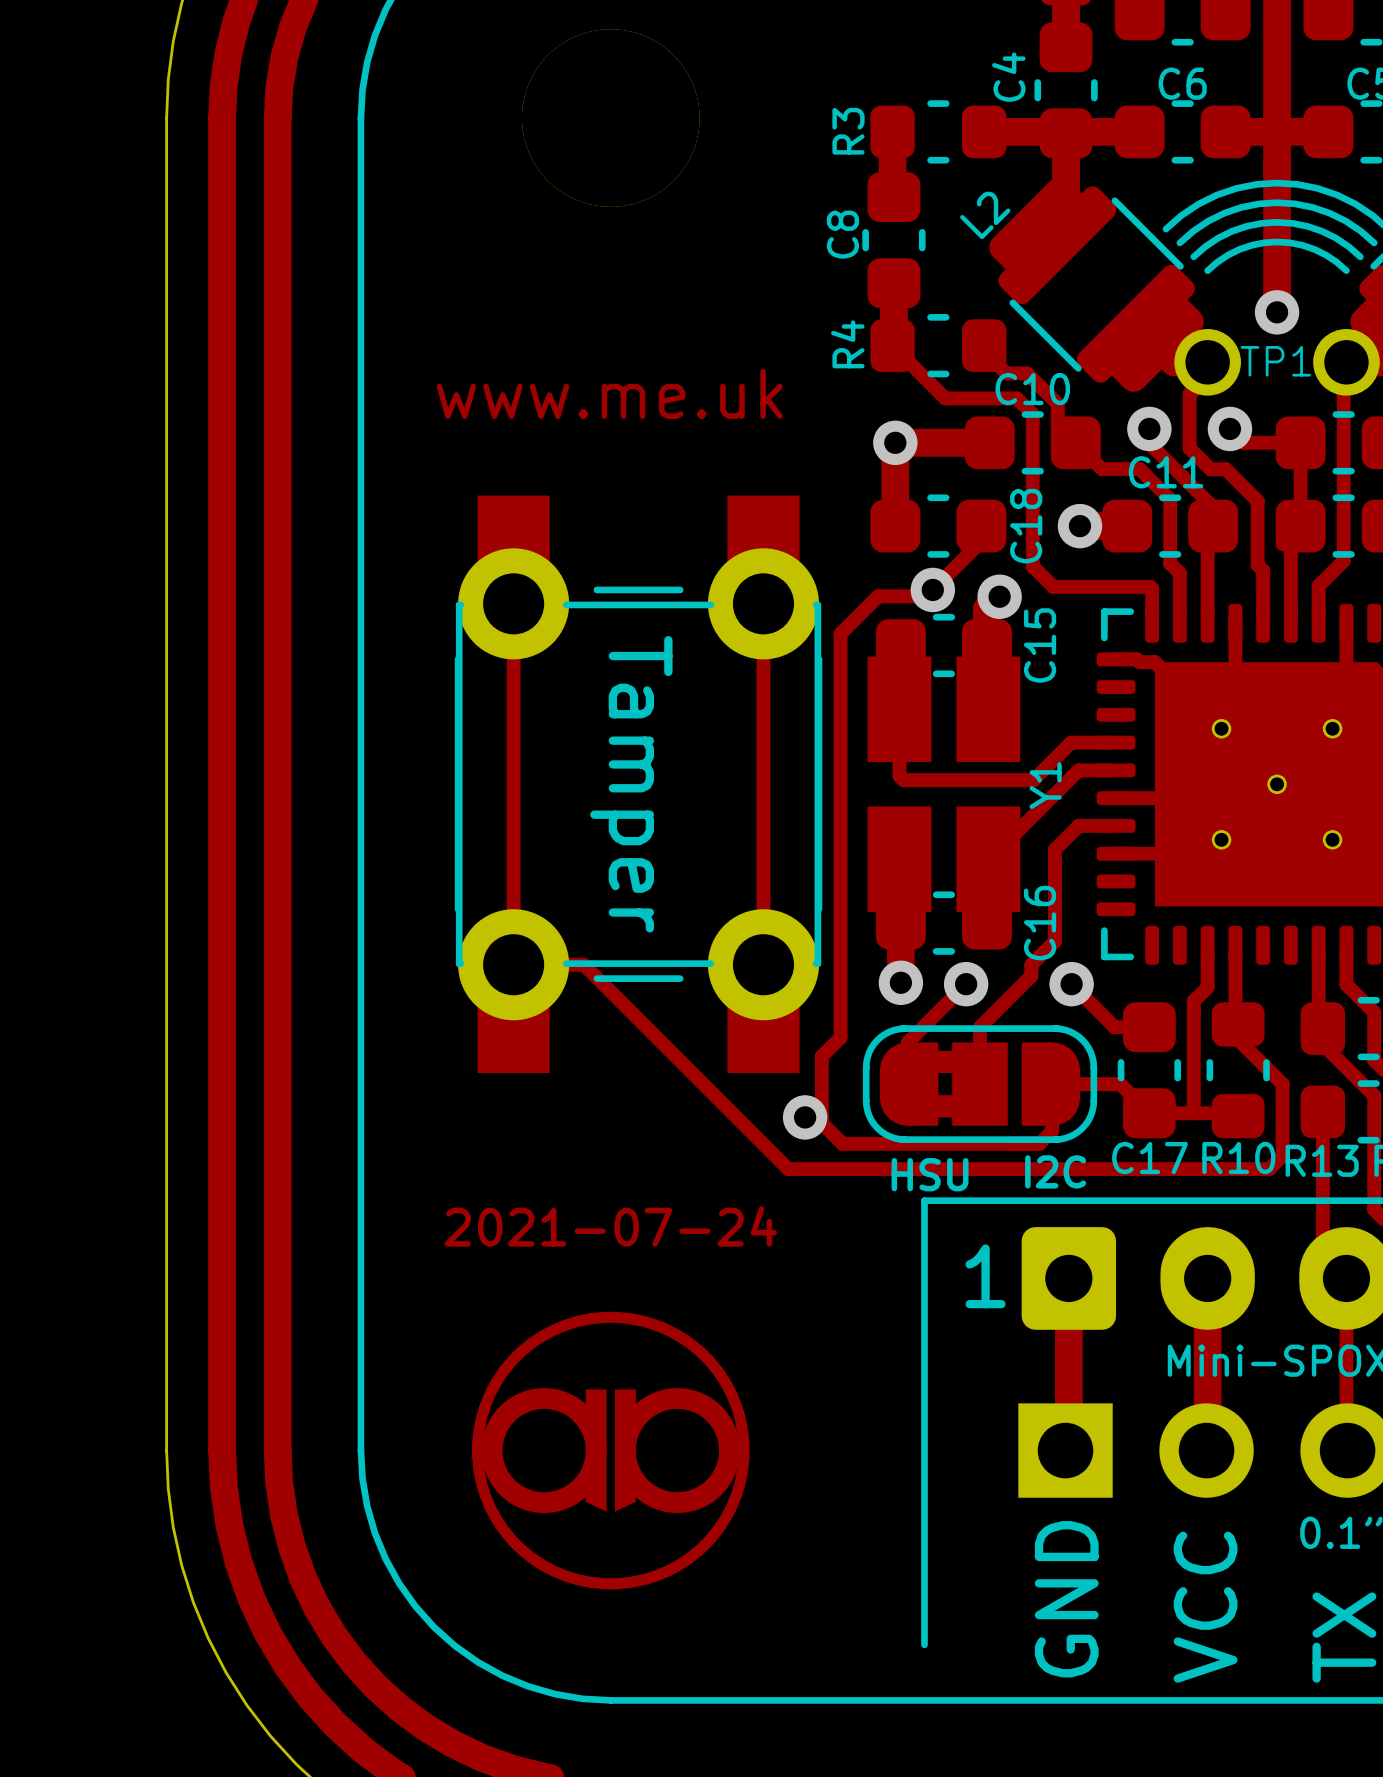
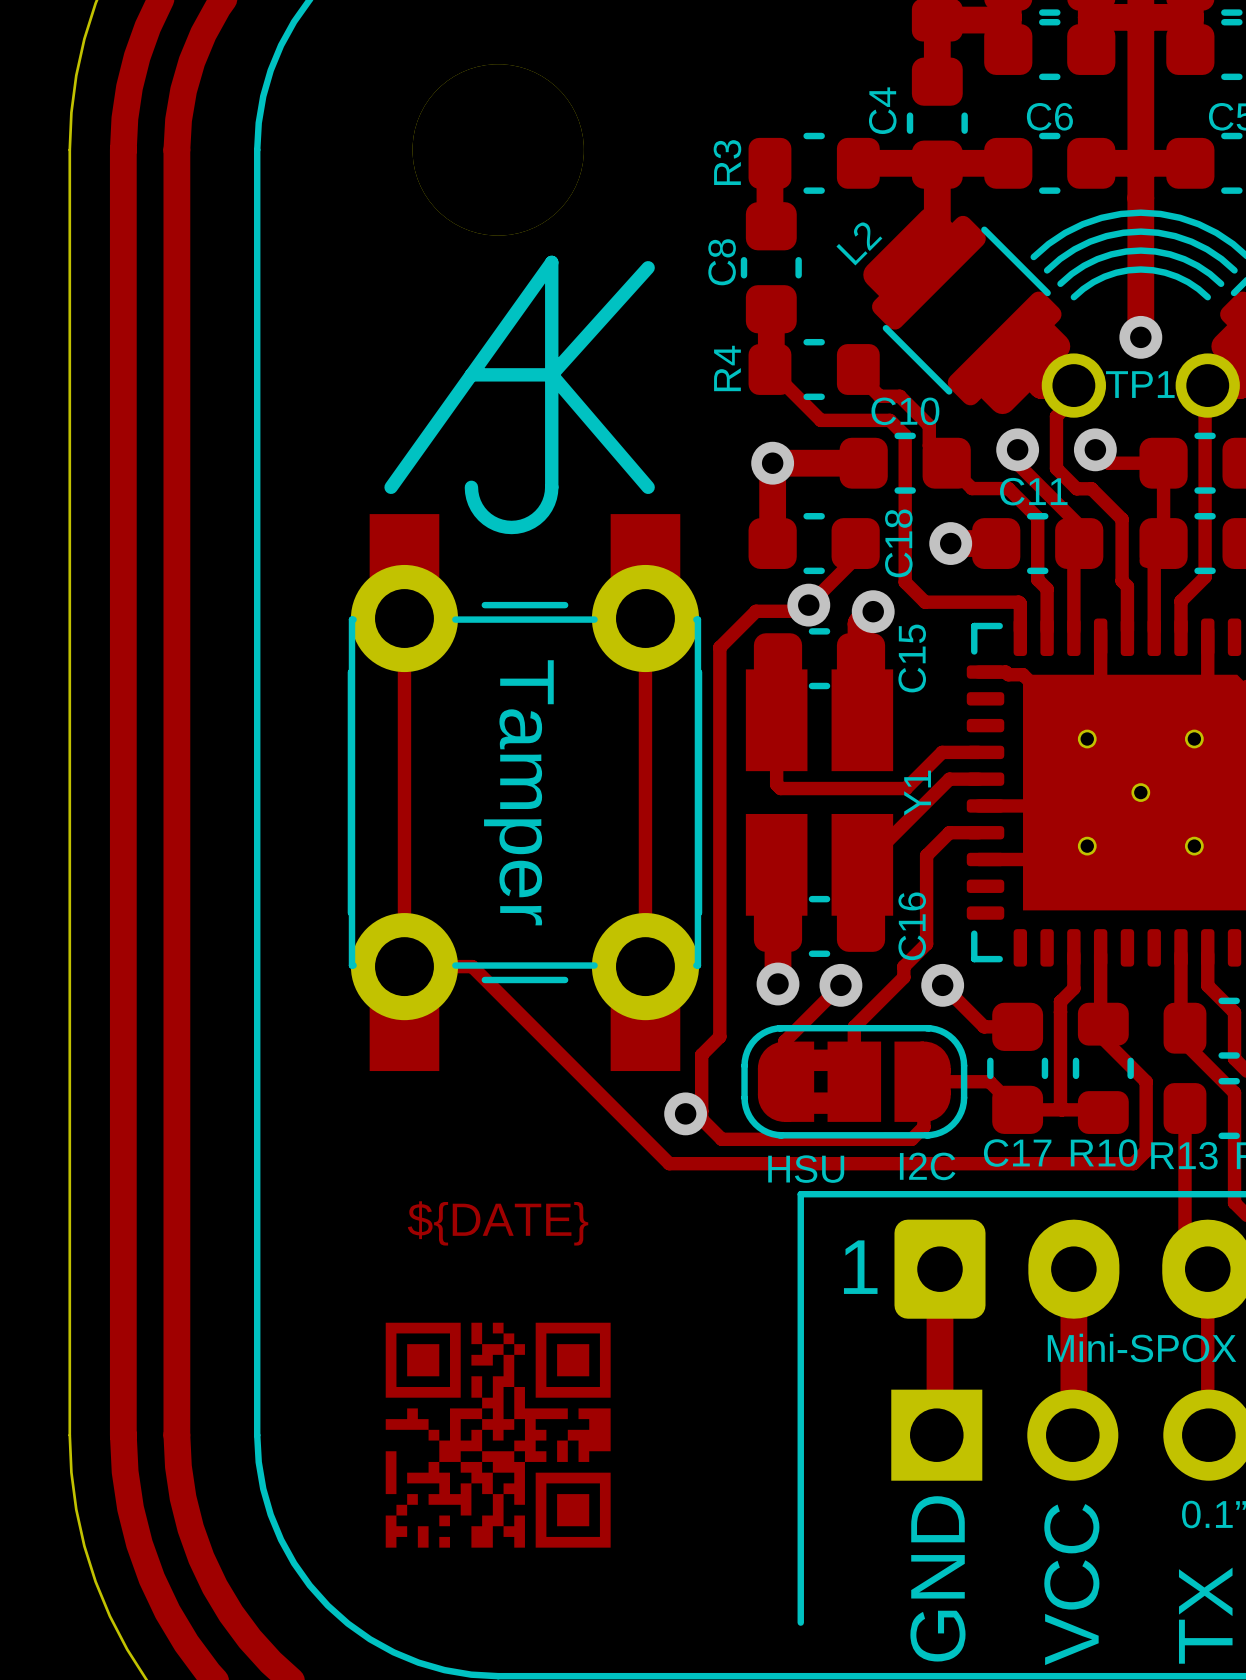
drawing: none -> [384, 255, 655, 535]
text: www.me.uk (609, 393) -> none
text: 2021-07-24 (610, 1226) -> ${DATE} (498, 1223)
part footprint: [471, 1311, 750, 1590] -> [385, 1322, 611, 1548]

